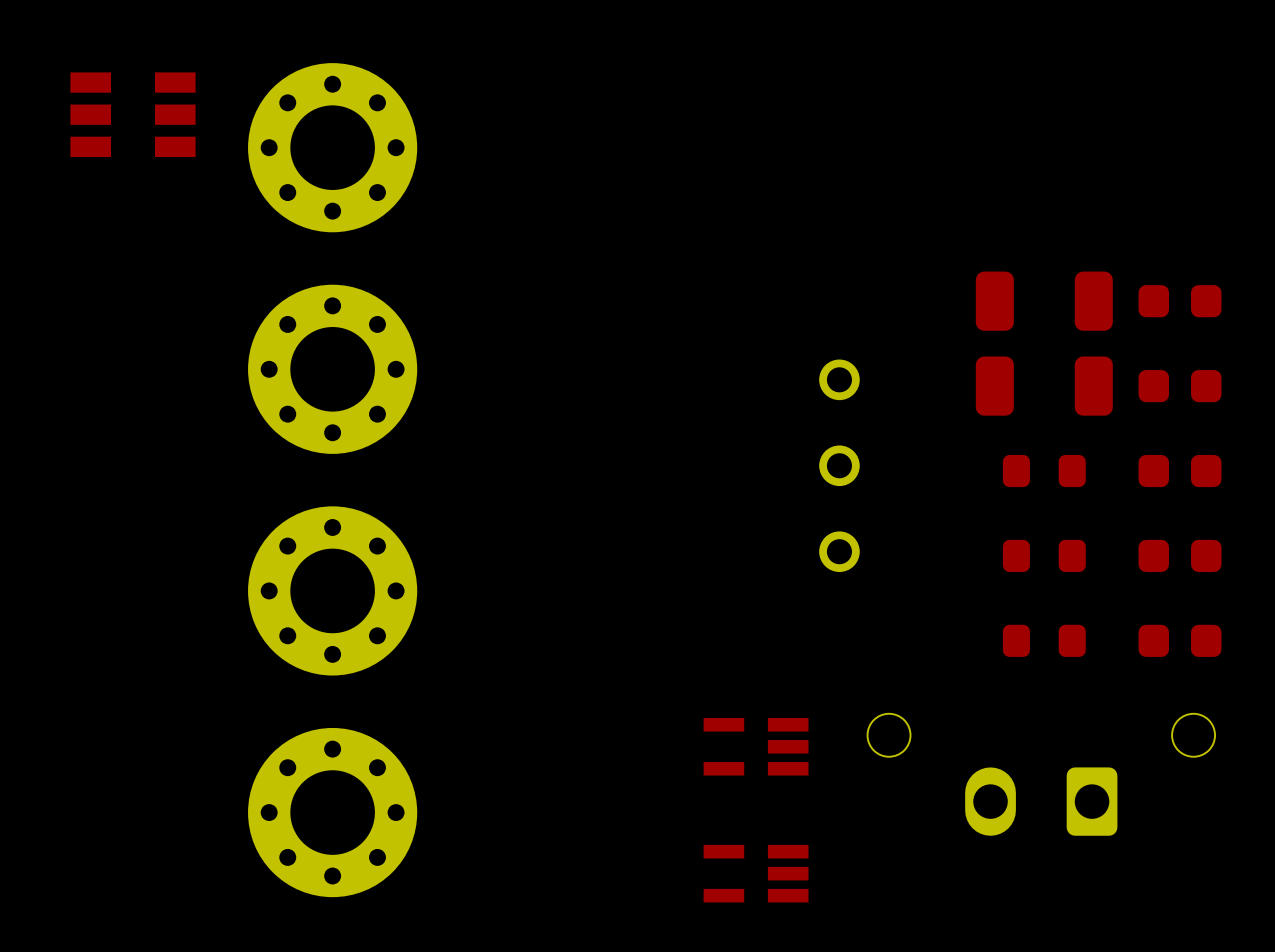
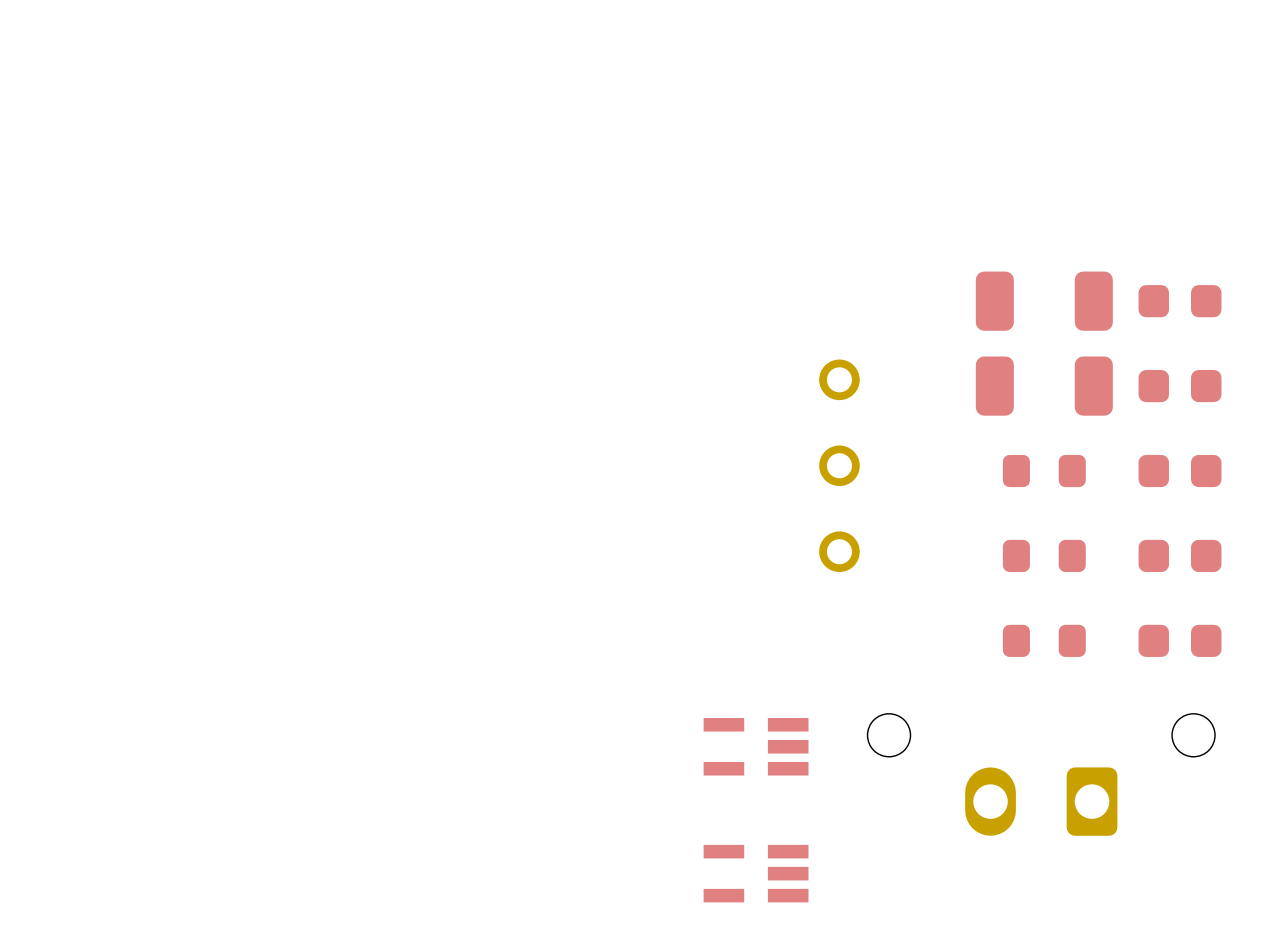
part: (132, 114) -> none
part: (332, 147) -> none
part: (332, 369) -> none
part: (332, 590) -> none
part: (332, 812) -> none

